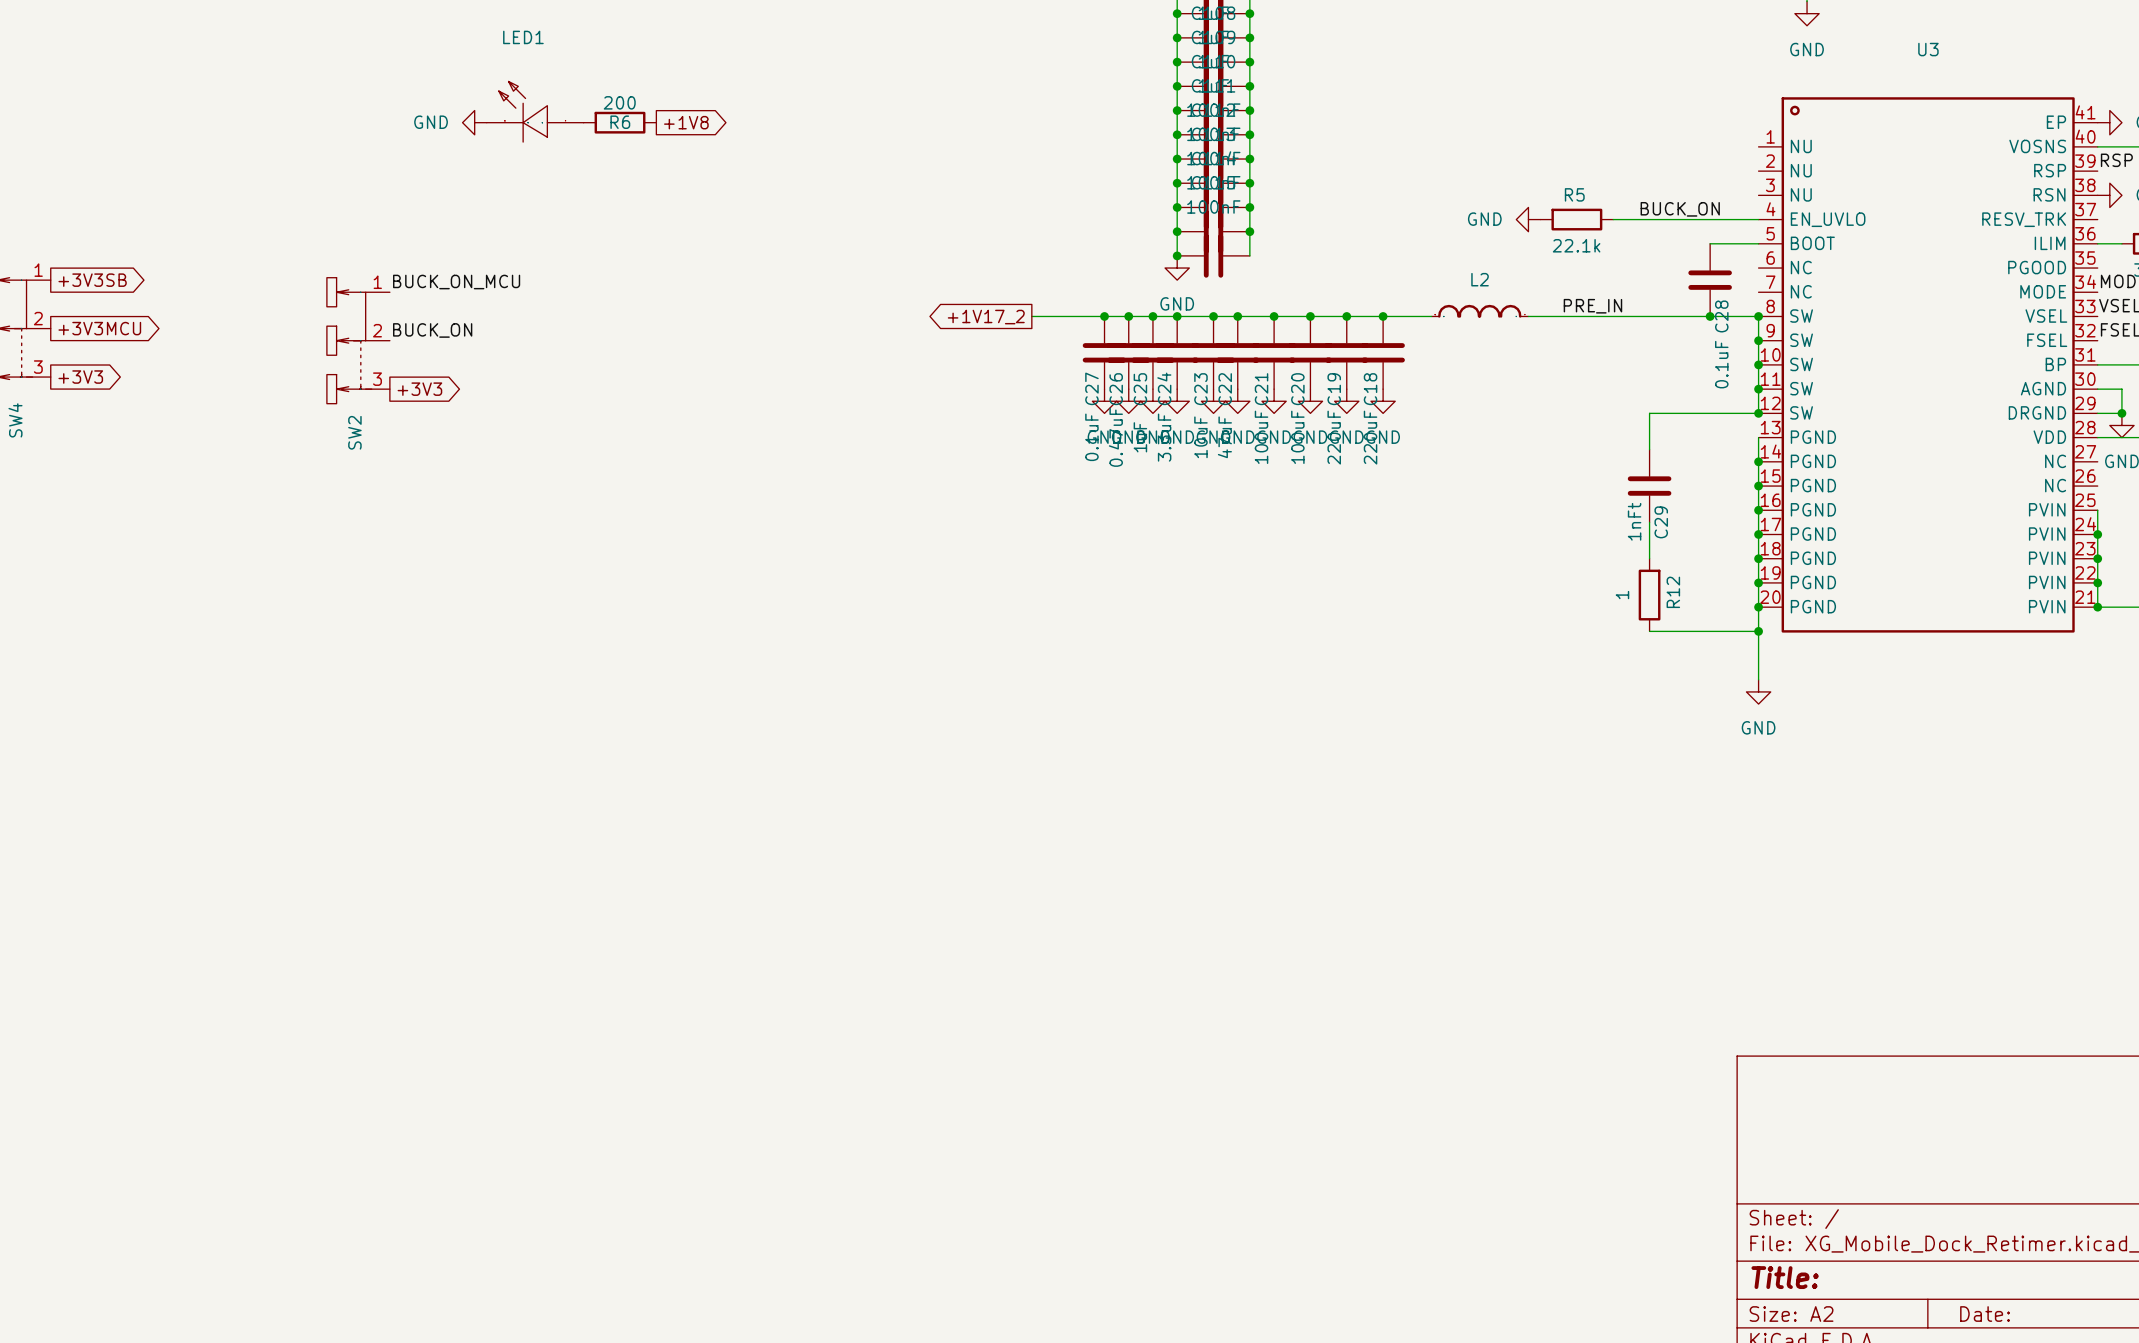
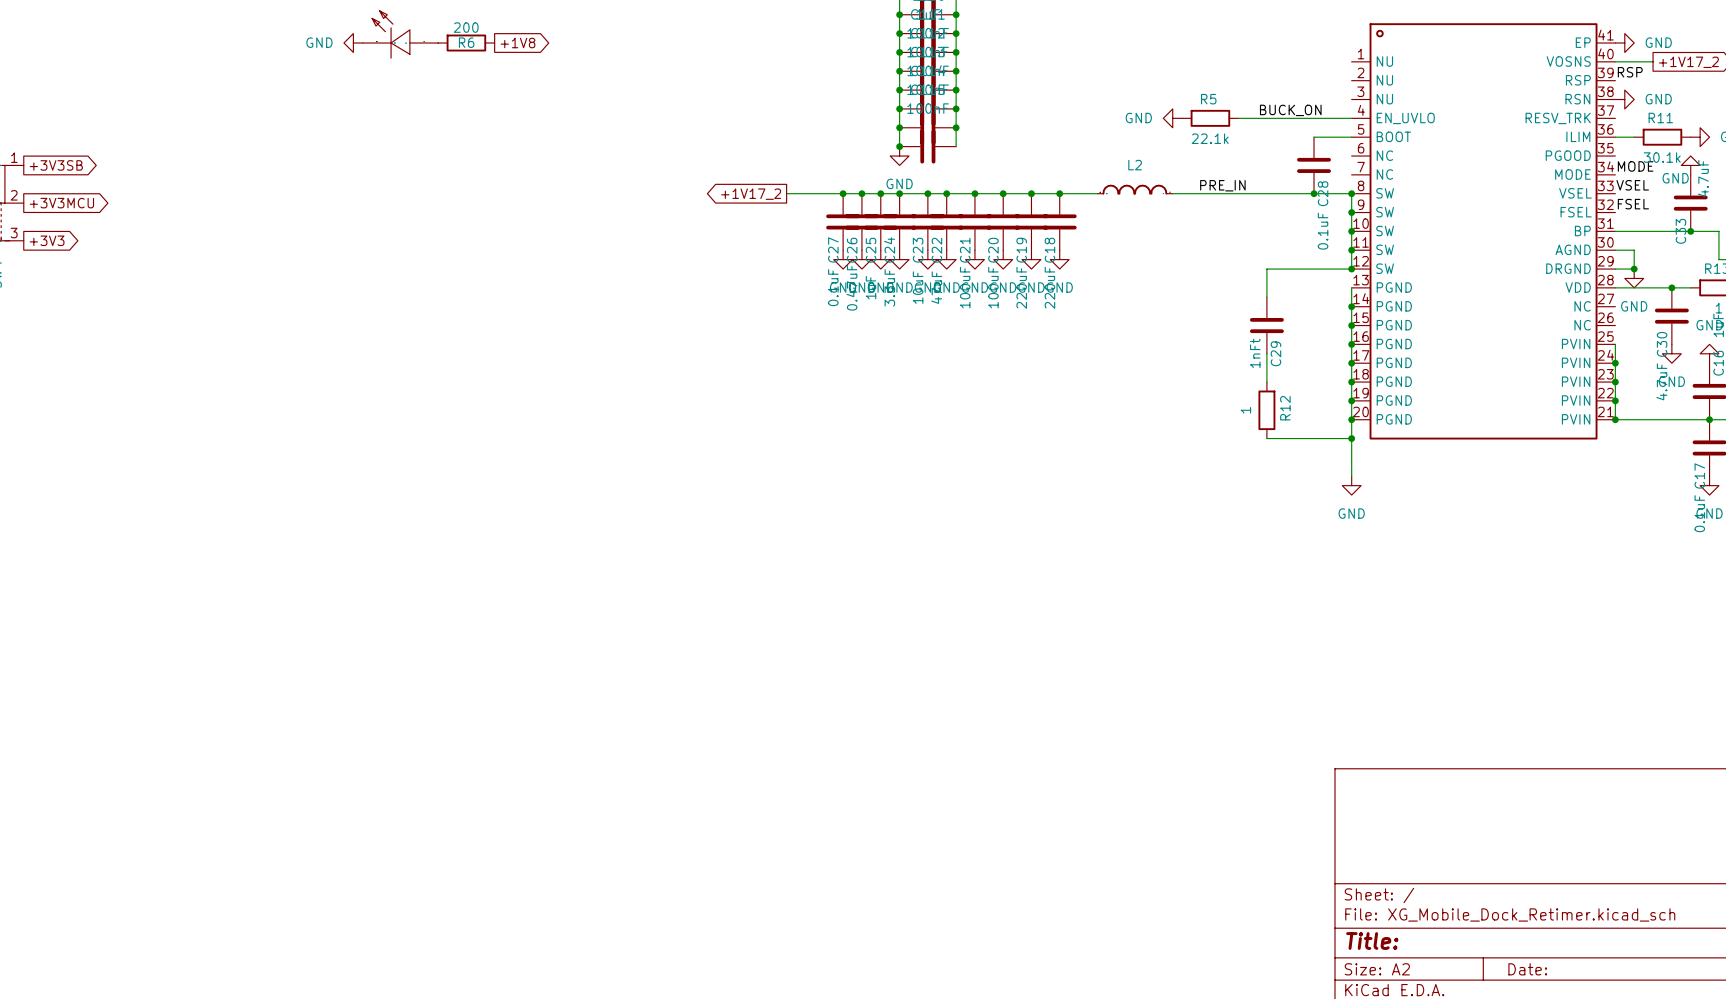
label: BUCK_ON_MCU (456, 282) -> none
label: BUCK_ON (432, 330) -> none
SW2: (358, 340) -> none
global label: +3V3 (419, 389) -> none

